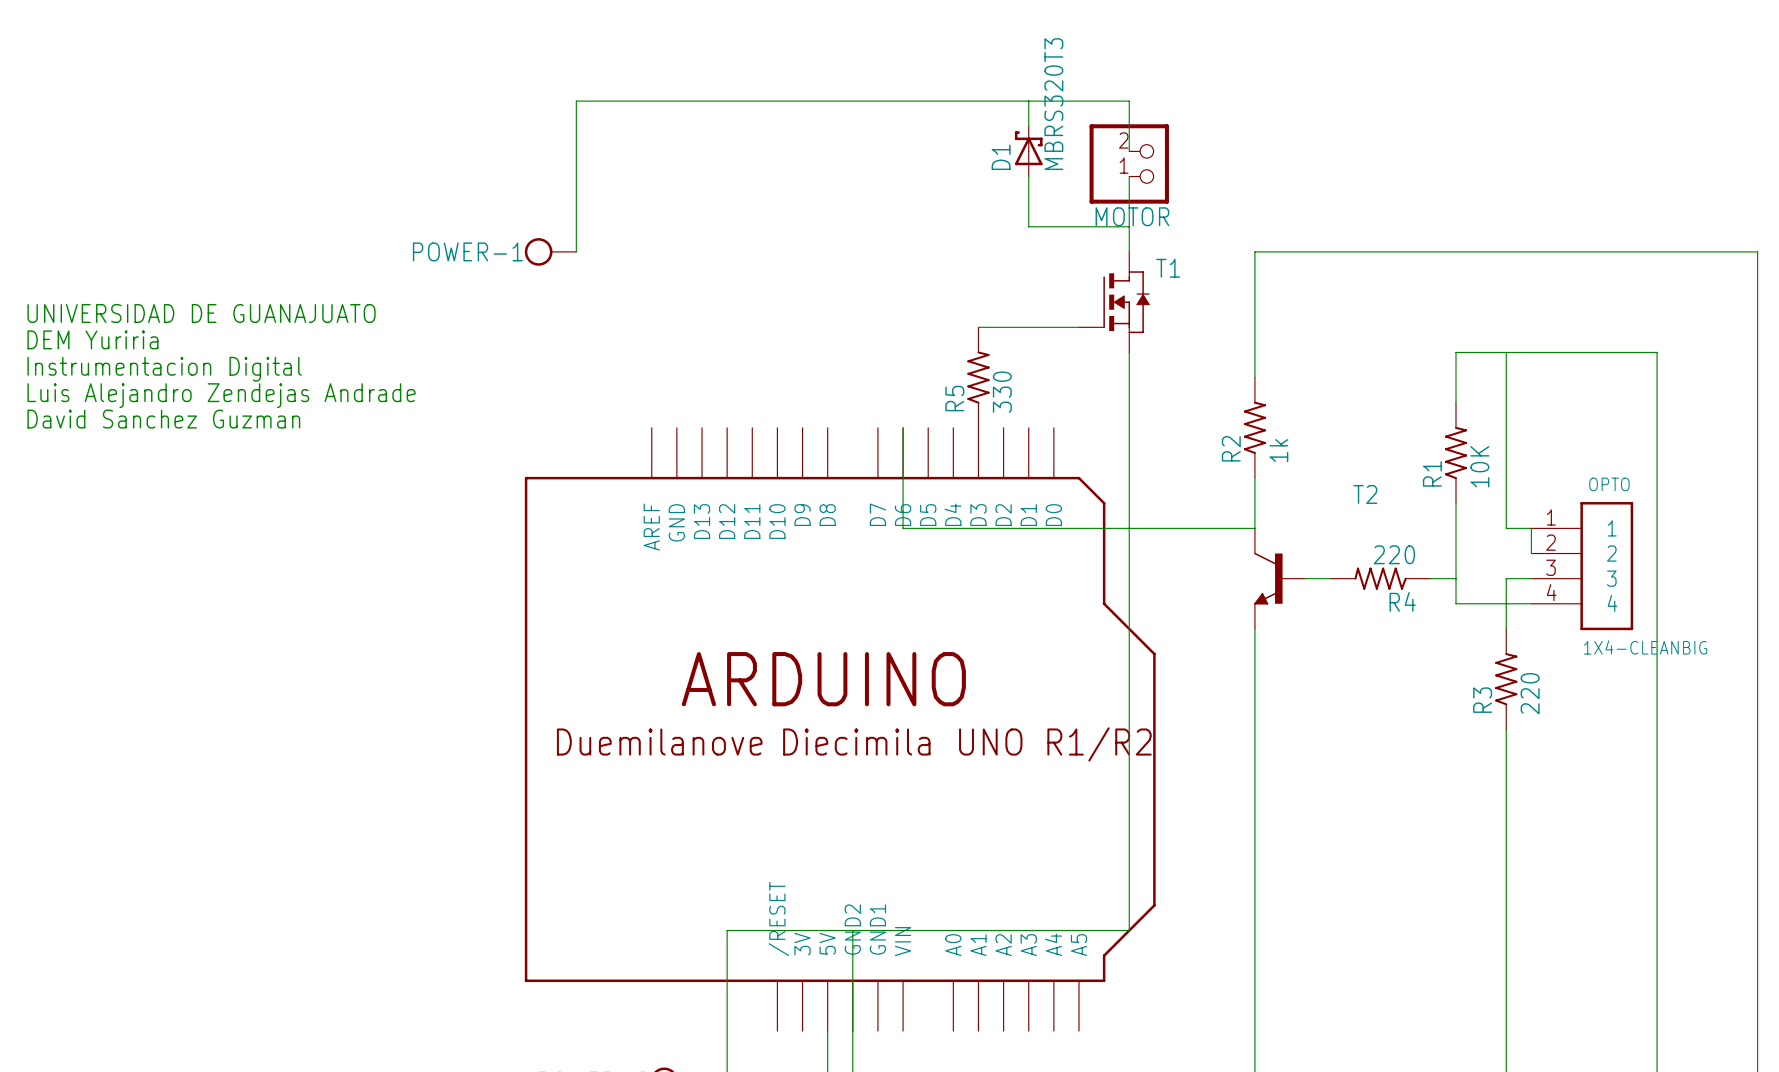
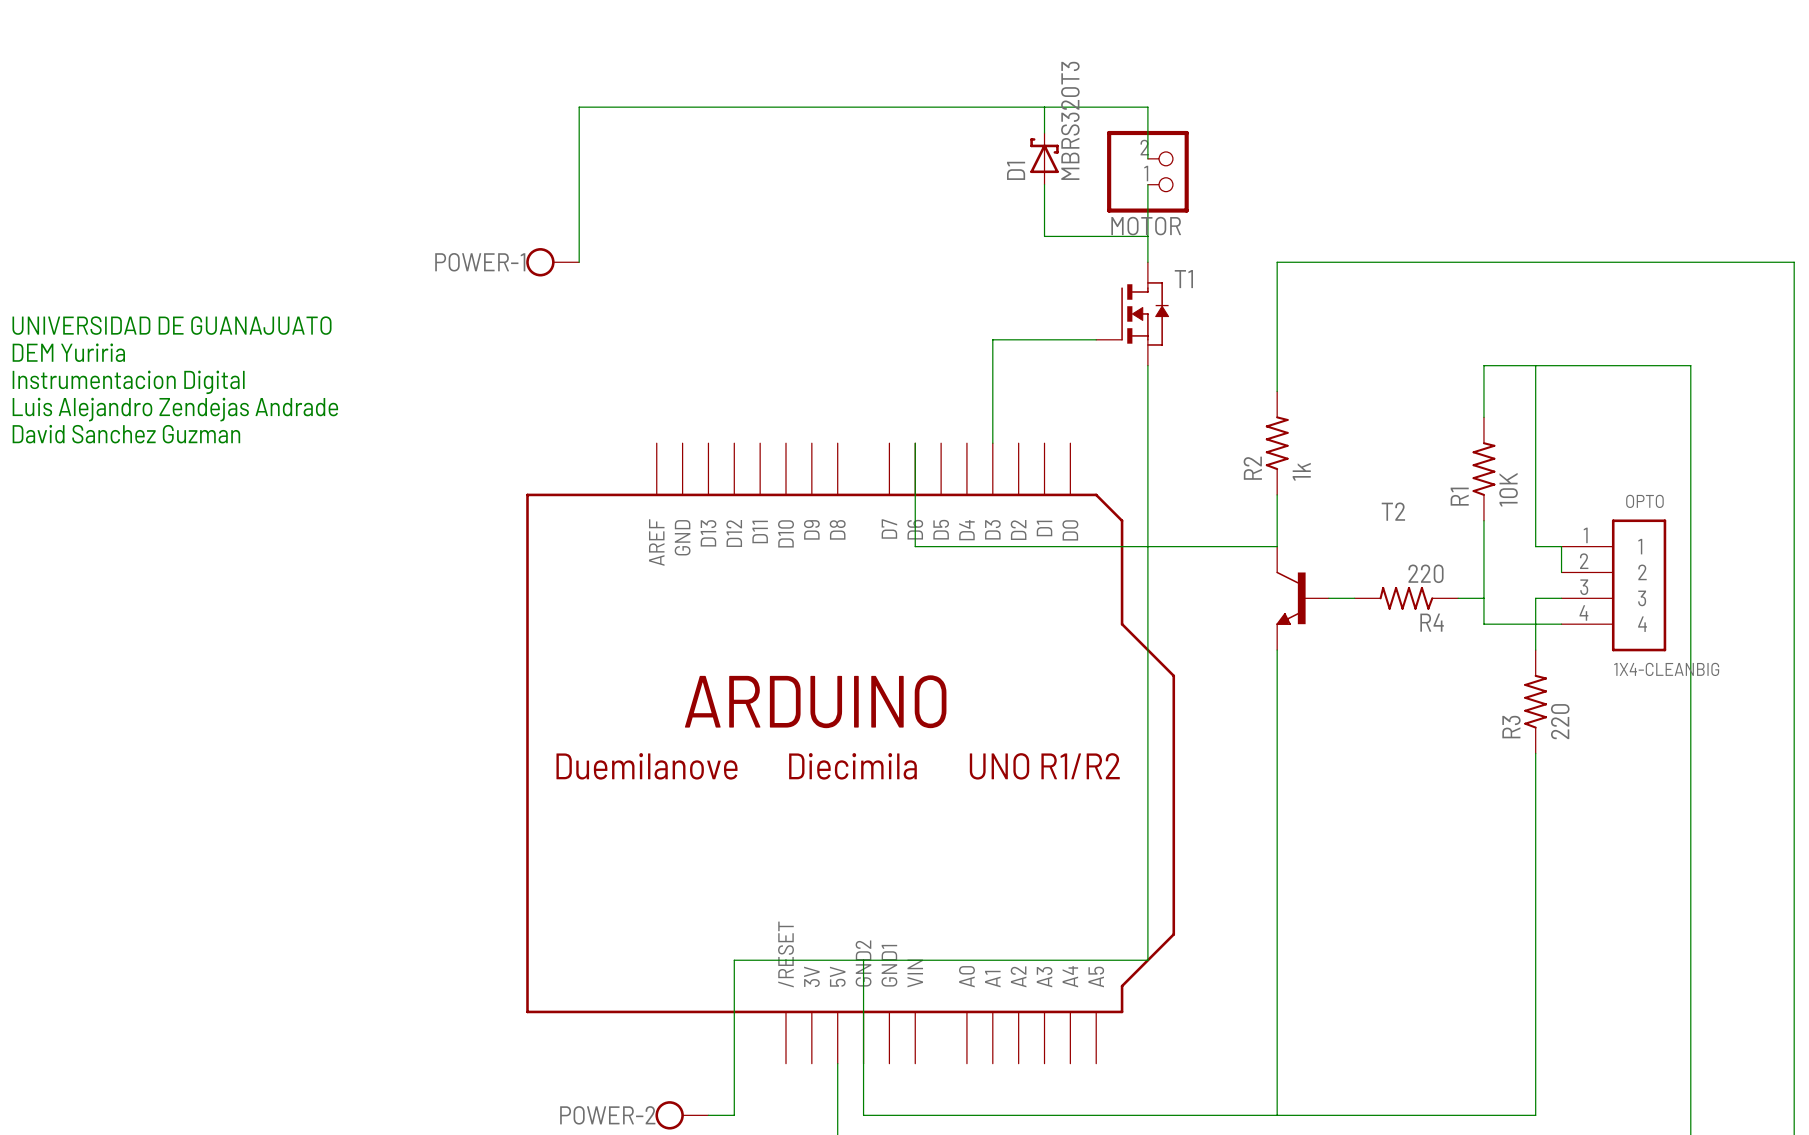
R5: 330 (978, 377) -> none

